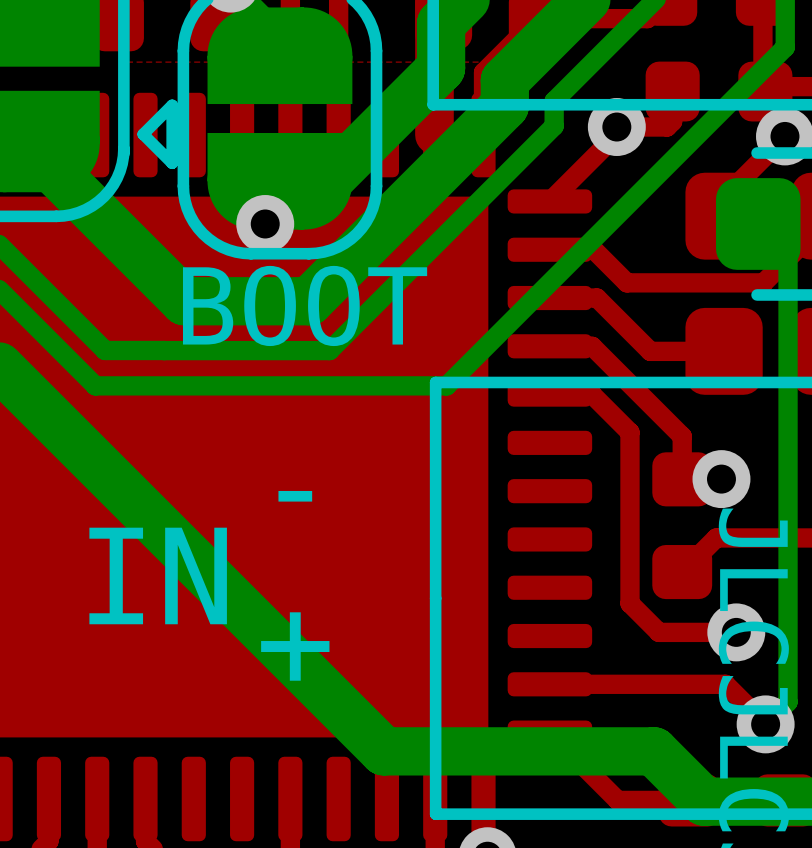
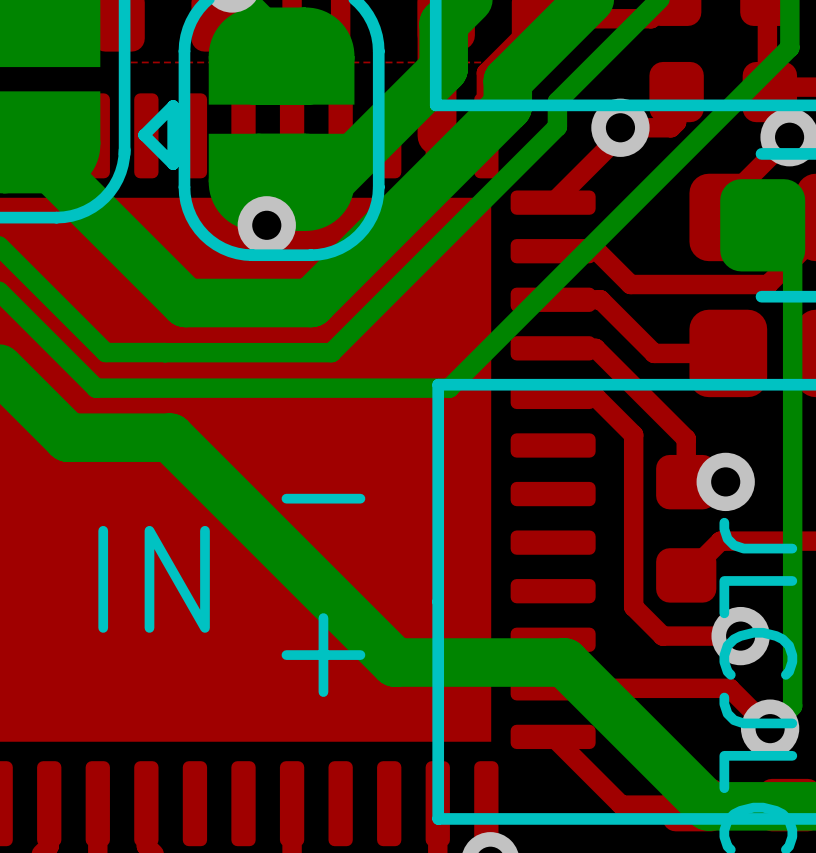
text: BOOT (305, 305) -> none
bottom track: (67, 435) (383, 751) (653, 751) -> (68, 437) (170, 437) (395, 662) (564, 662) (657, 755)

